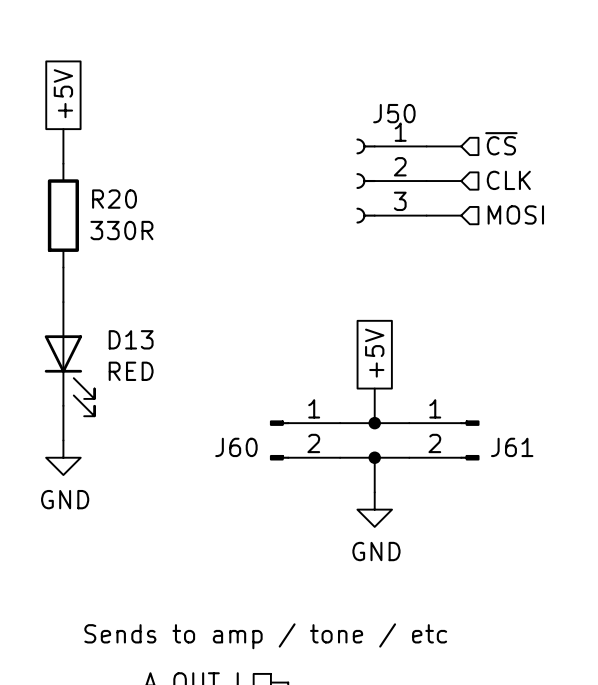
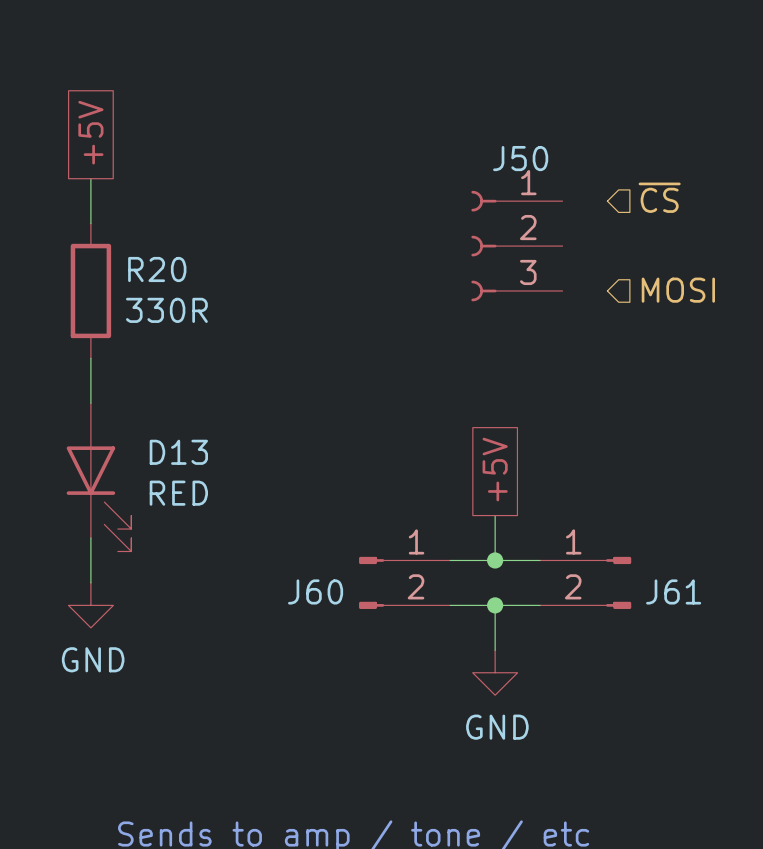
wire: (426, 146) (461, 146) -> none
hierarchical label: CLK (508, 180) -> none
wire: (426, 181) (461, 181) -> none
wire: (426, 215) (461, 215) -> none

